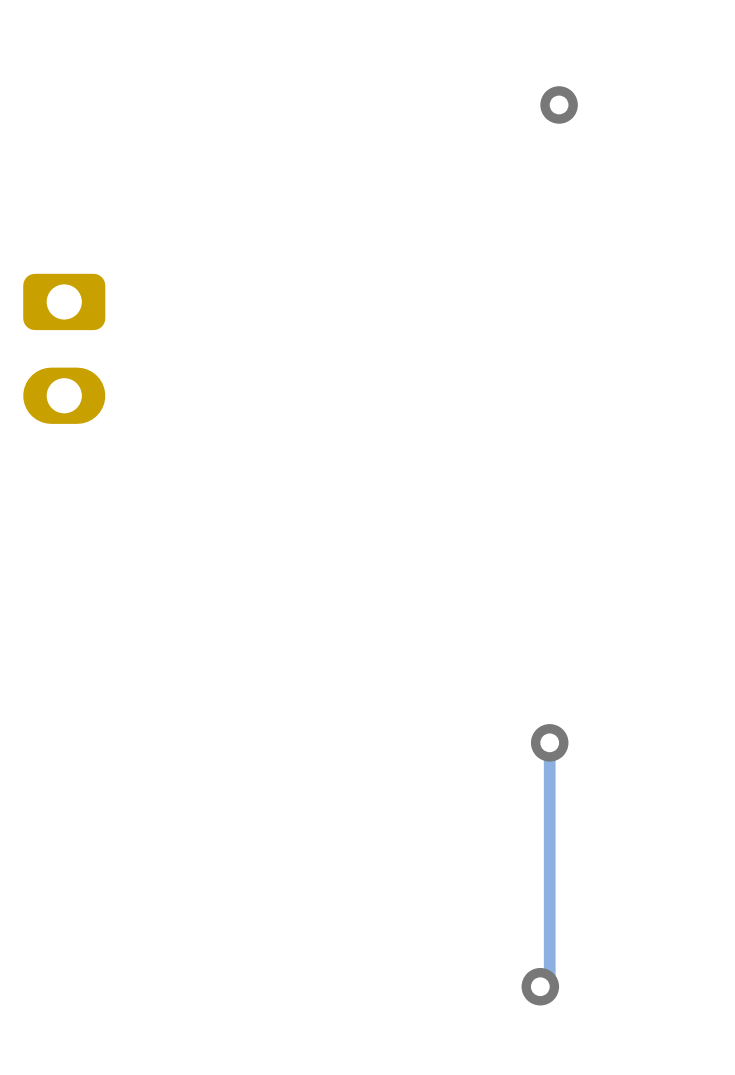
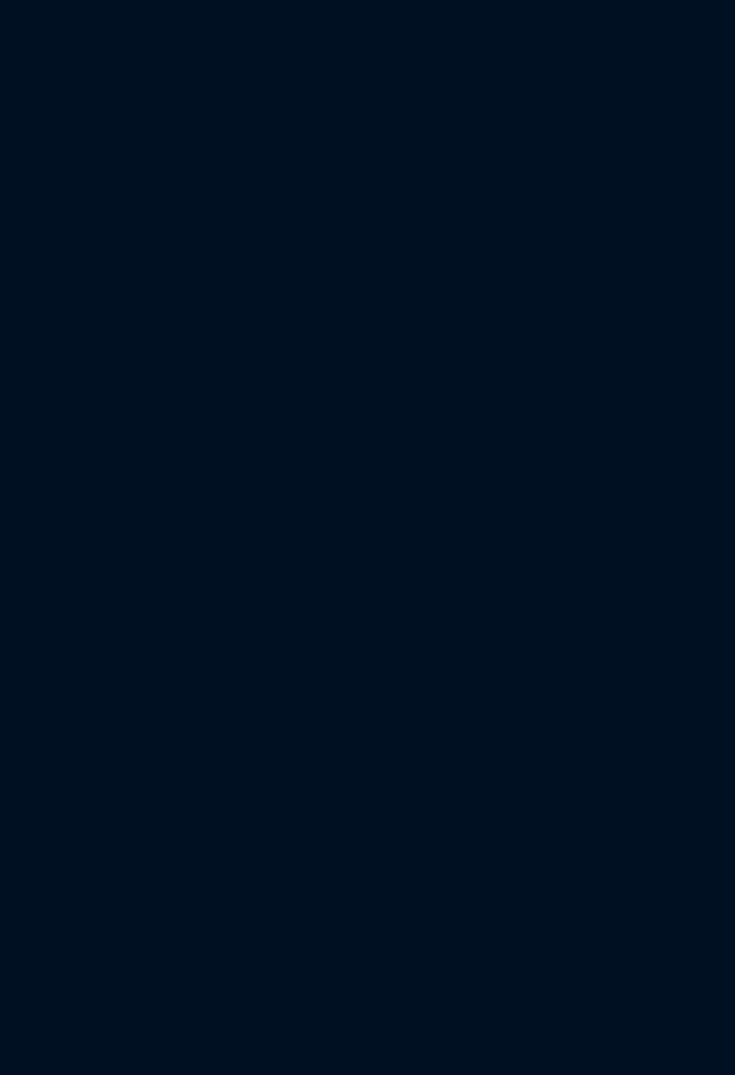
via: (559, 104) -> none
part: (64, 348) -> none
track: (549, 742) (549, 977) (540, 986) -> none
via: (549, 742) -> none
via: (540, 986) -> none

